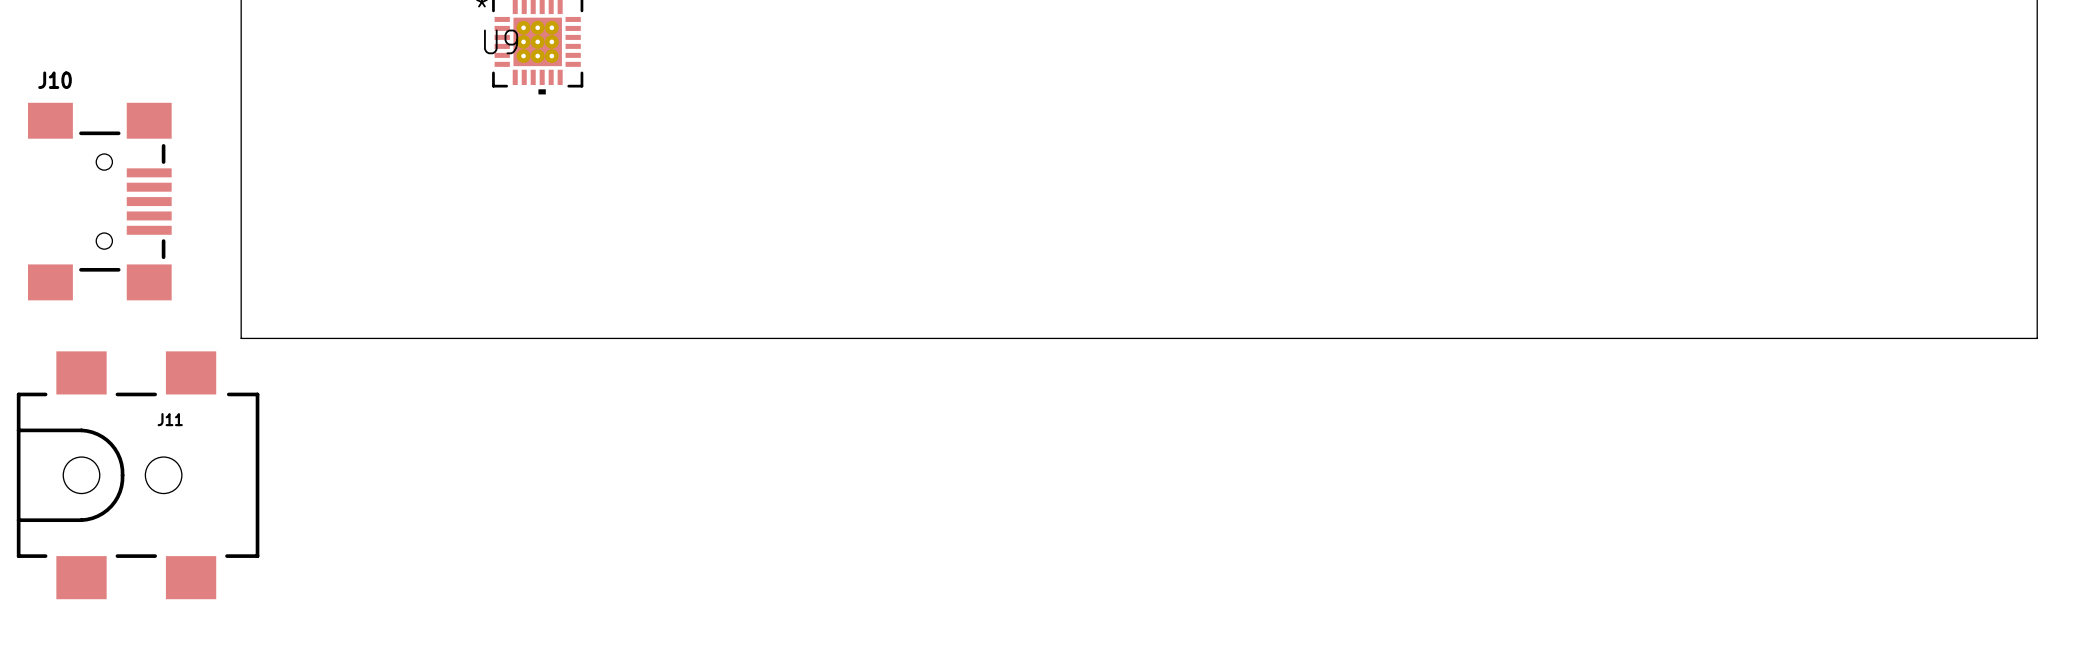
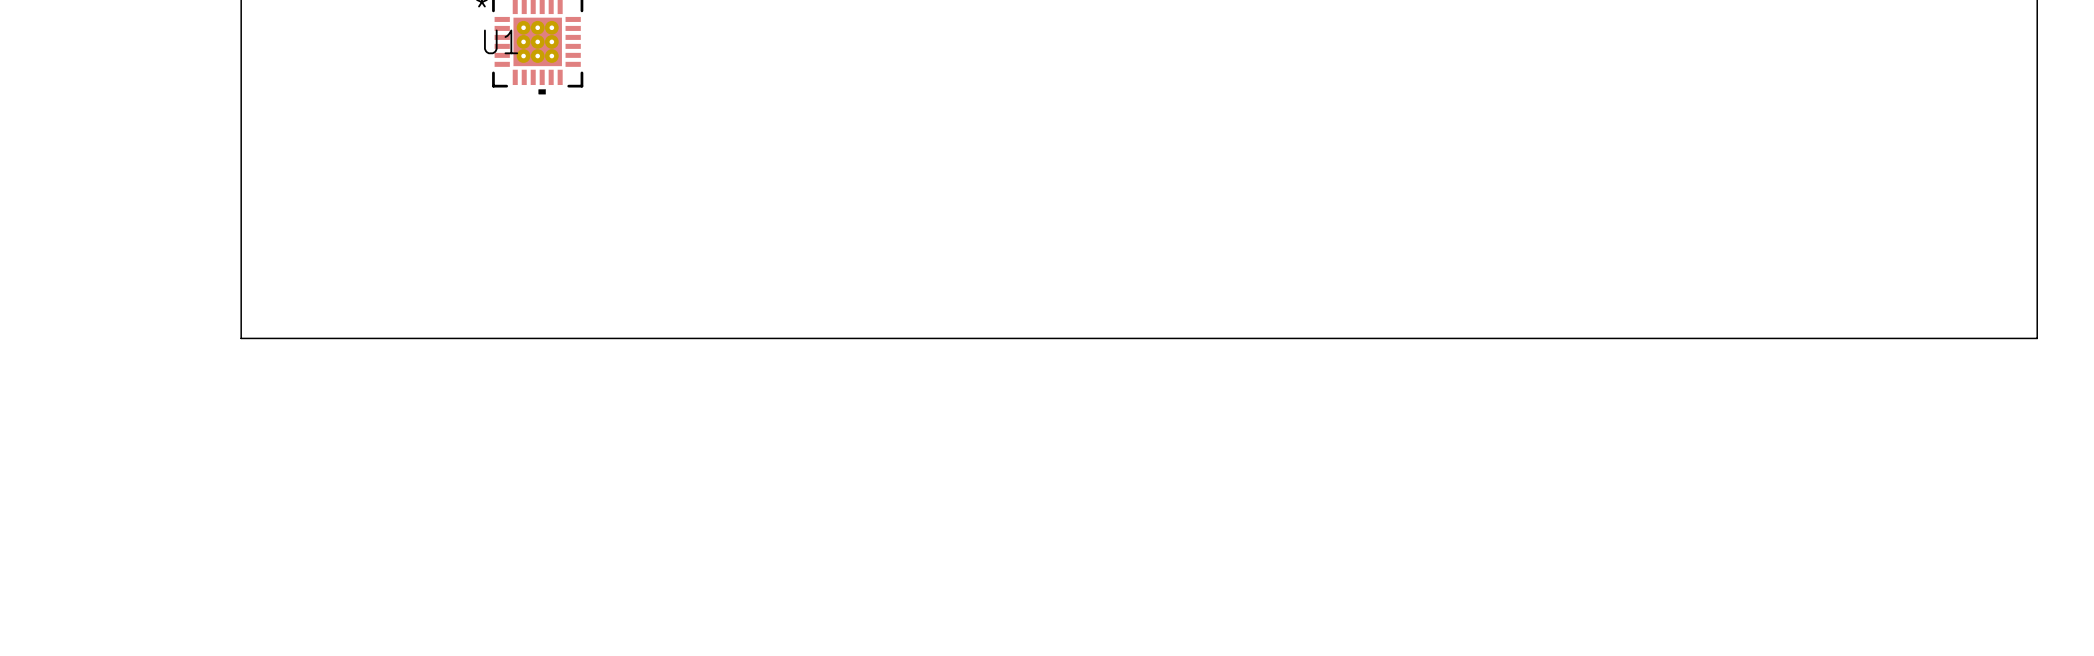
U9 name: U9 (501, 41) -> U1 (501, 41)
J10: (99, 201) -> none
J11: (138, 475) -> none

